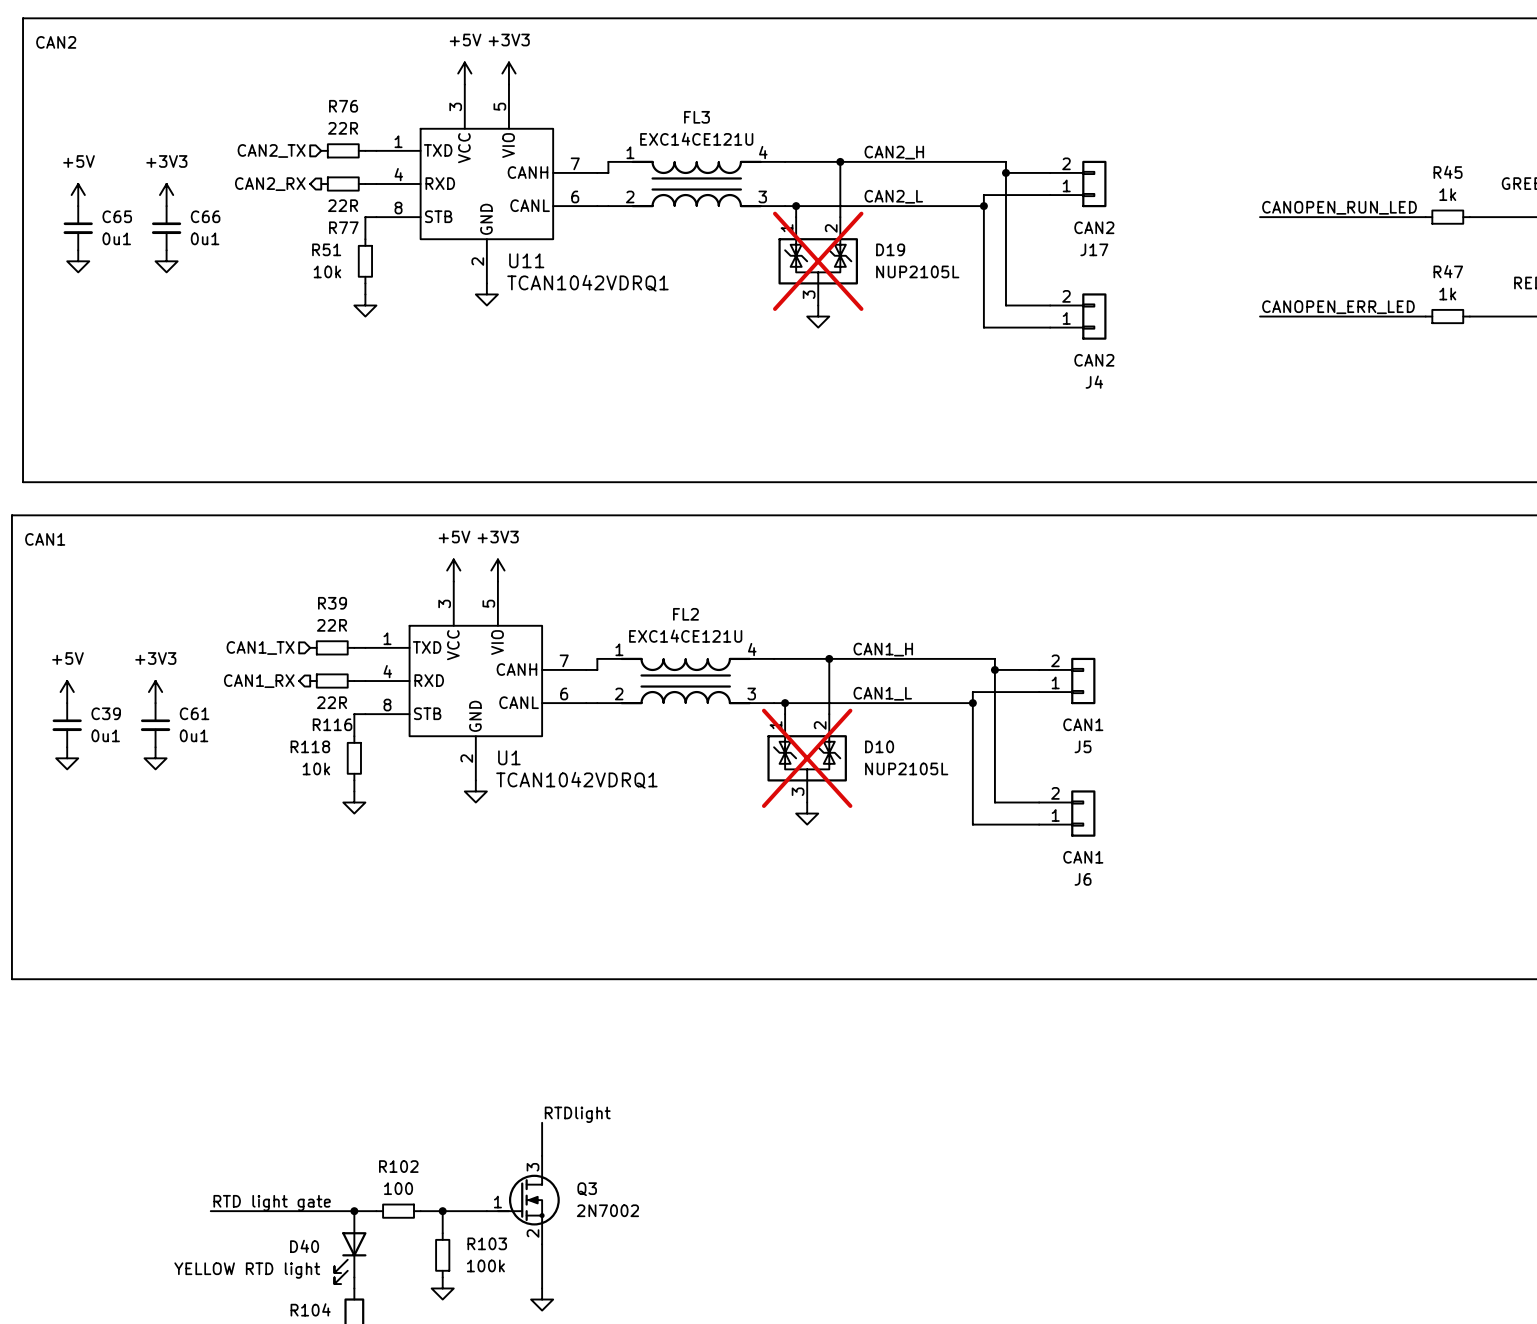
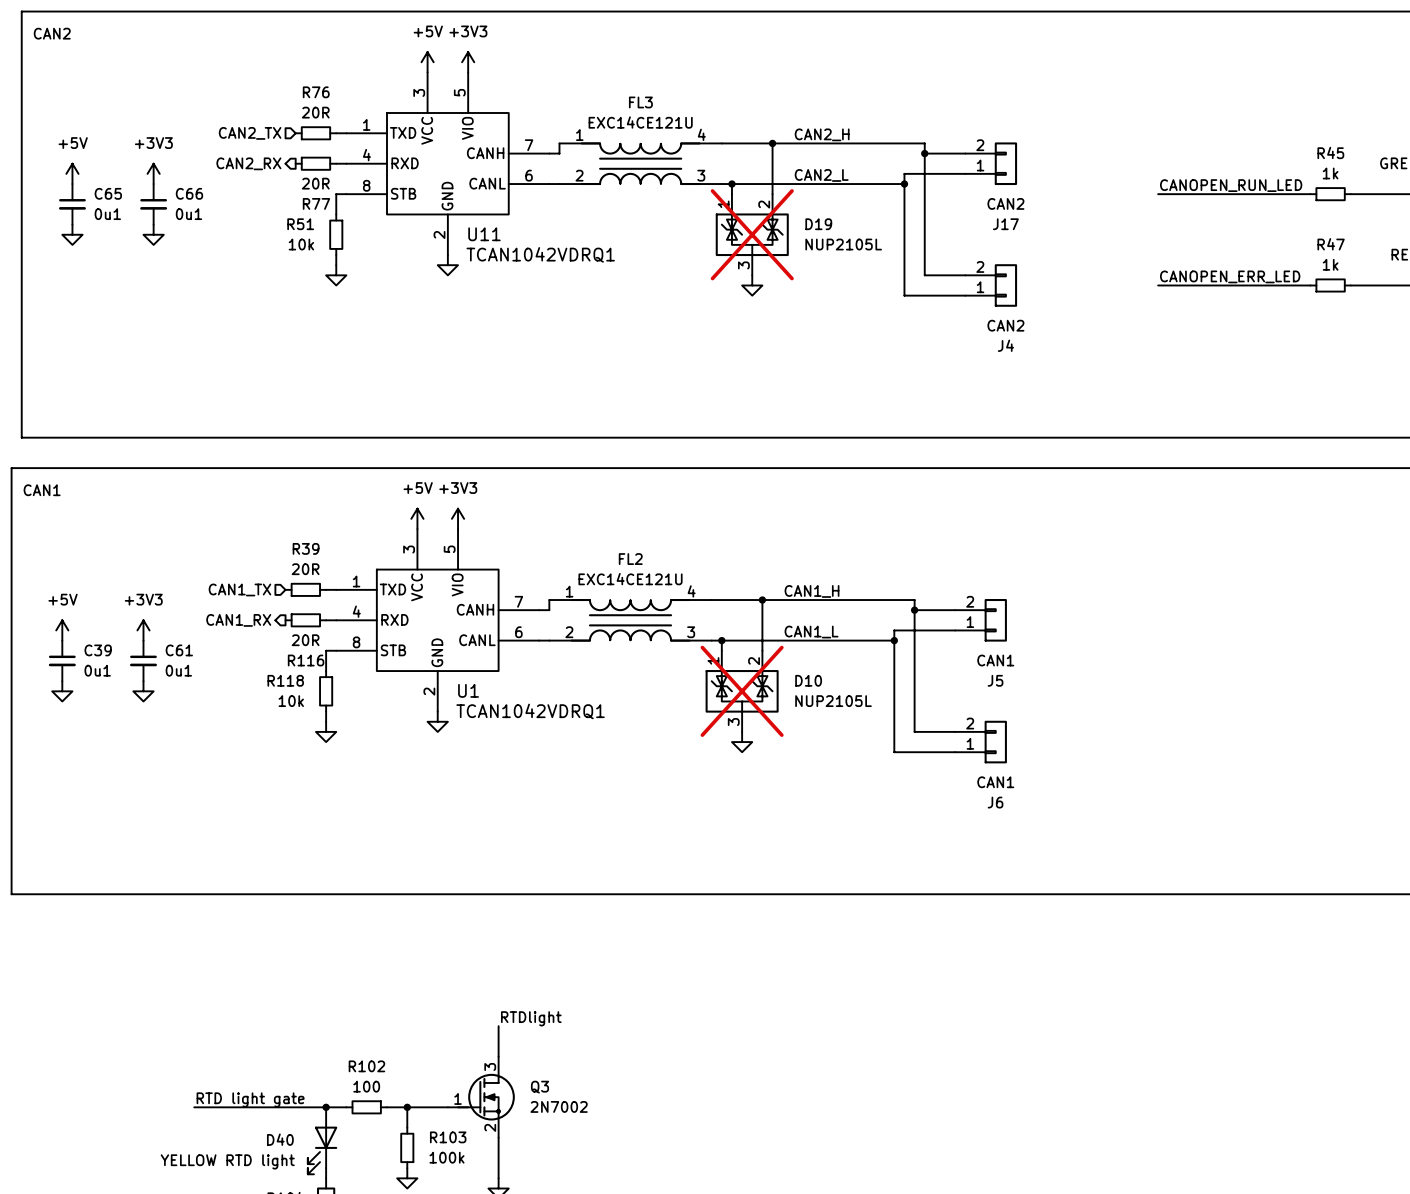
R76 value: 22R (343, 128) -> 20R (315, 112)
R77 value: 22R (343, 205) -> 20R (315, 183)
R39 value: 22R (332, 625) -> 20R (305, 569)
R116 value: 22R (332, 702) -> 20R (305, 640)

